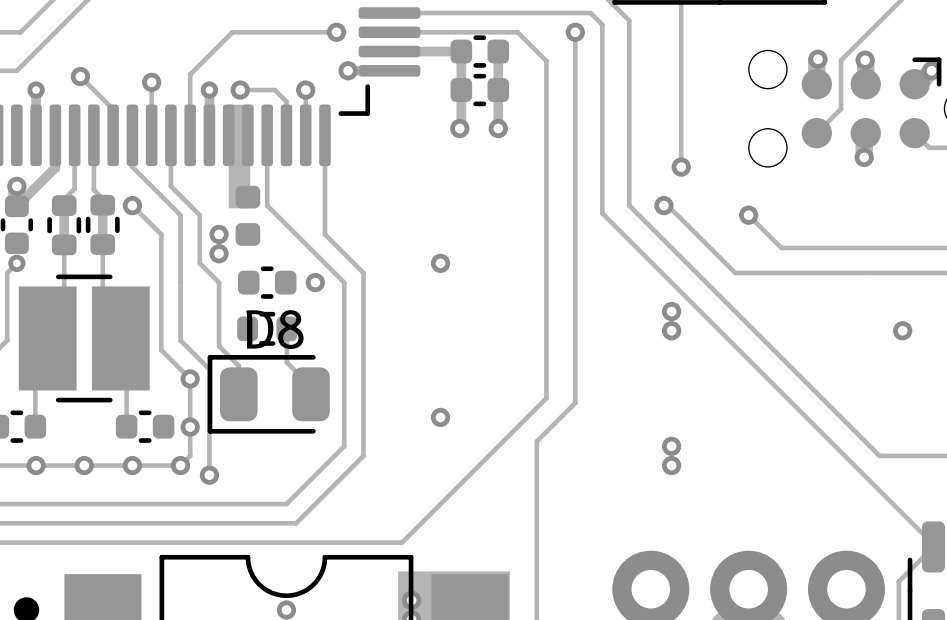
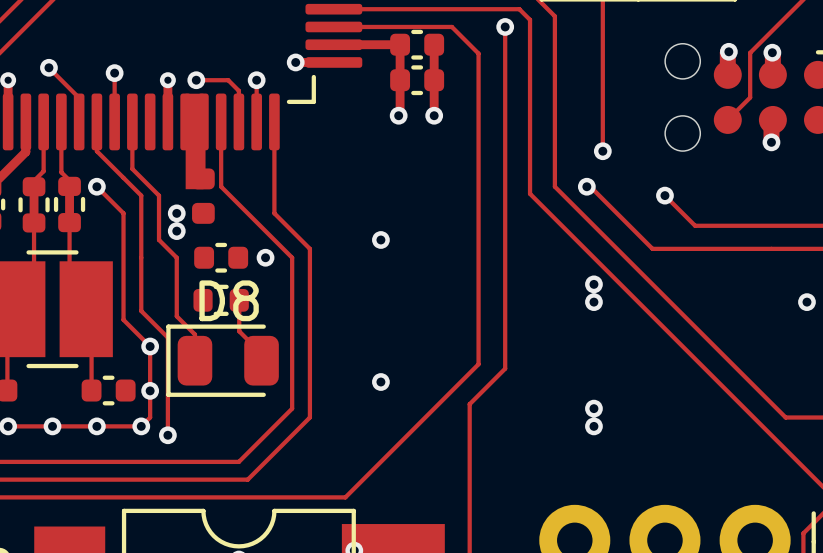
track: (336, 32) (232, 32) (190, 74) (190, 135) -> none
via: (336, 32) -> none

